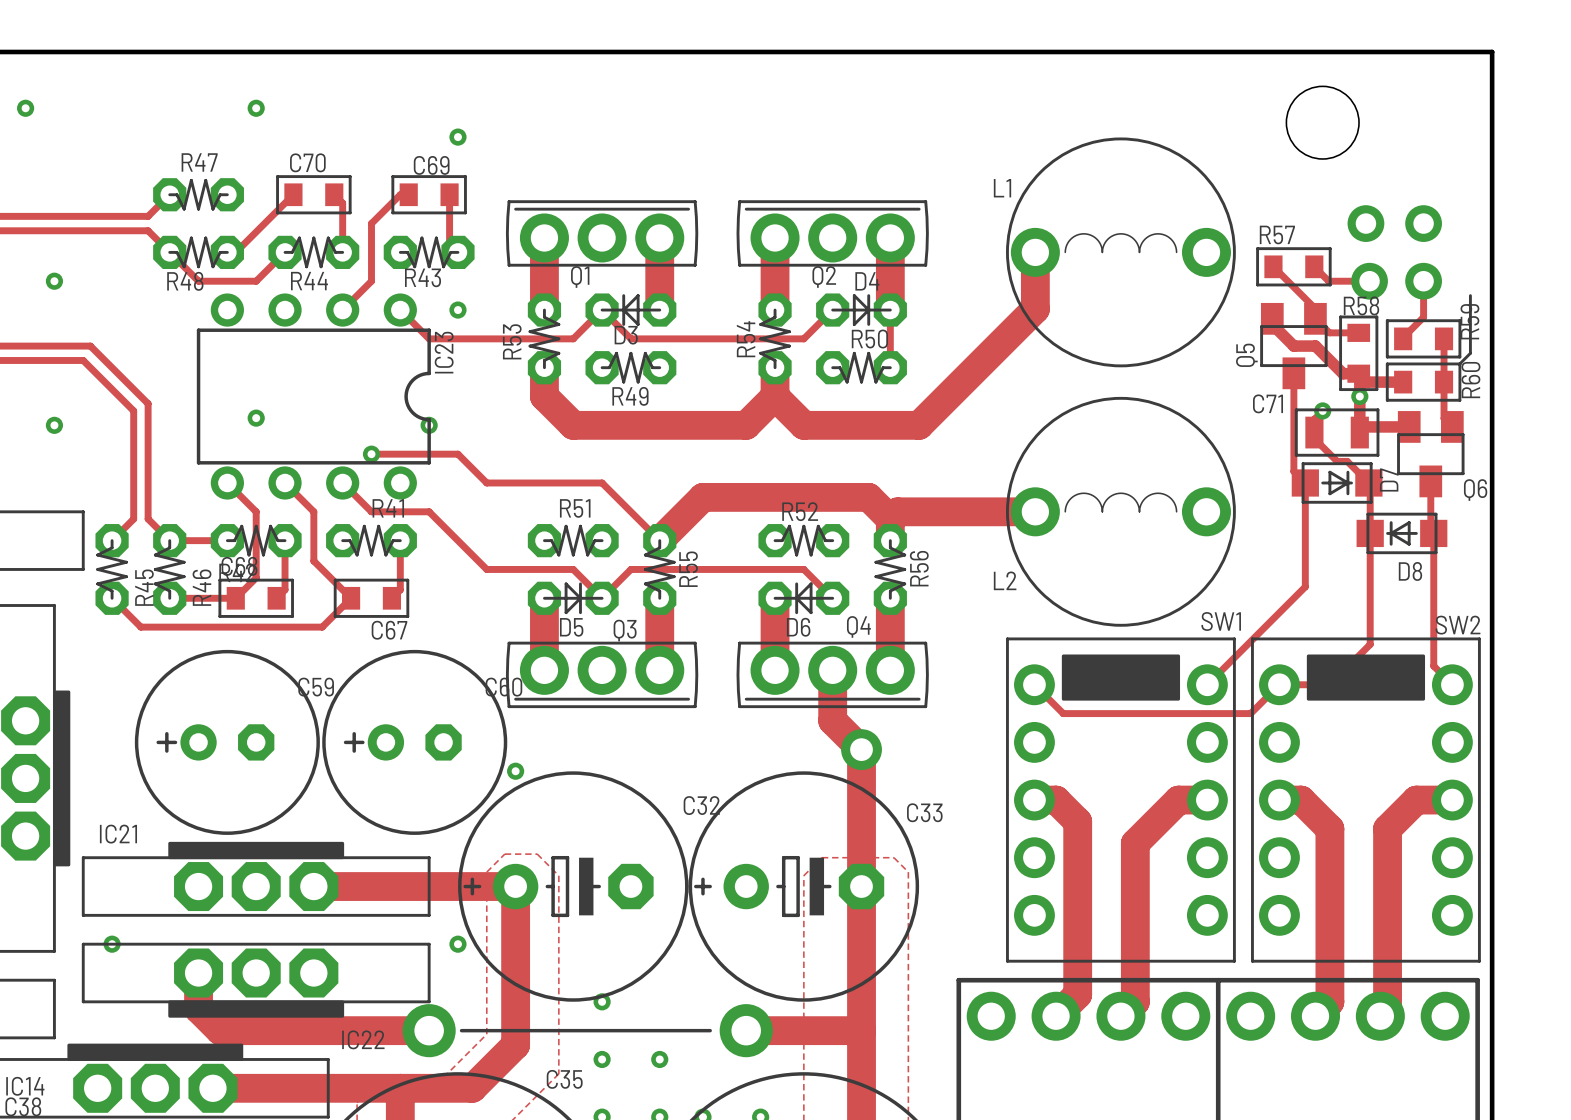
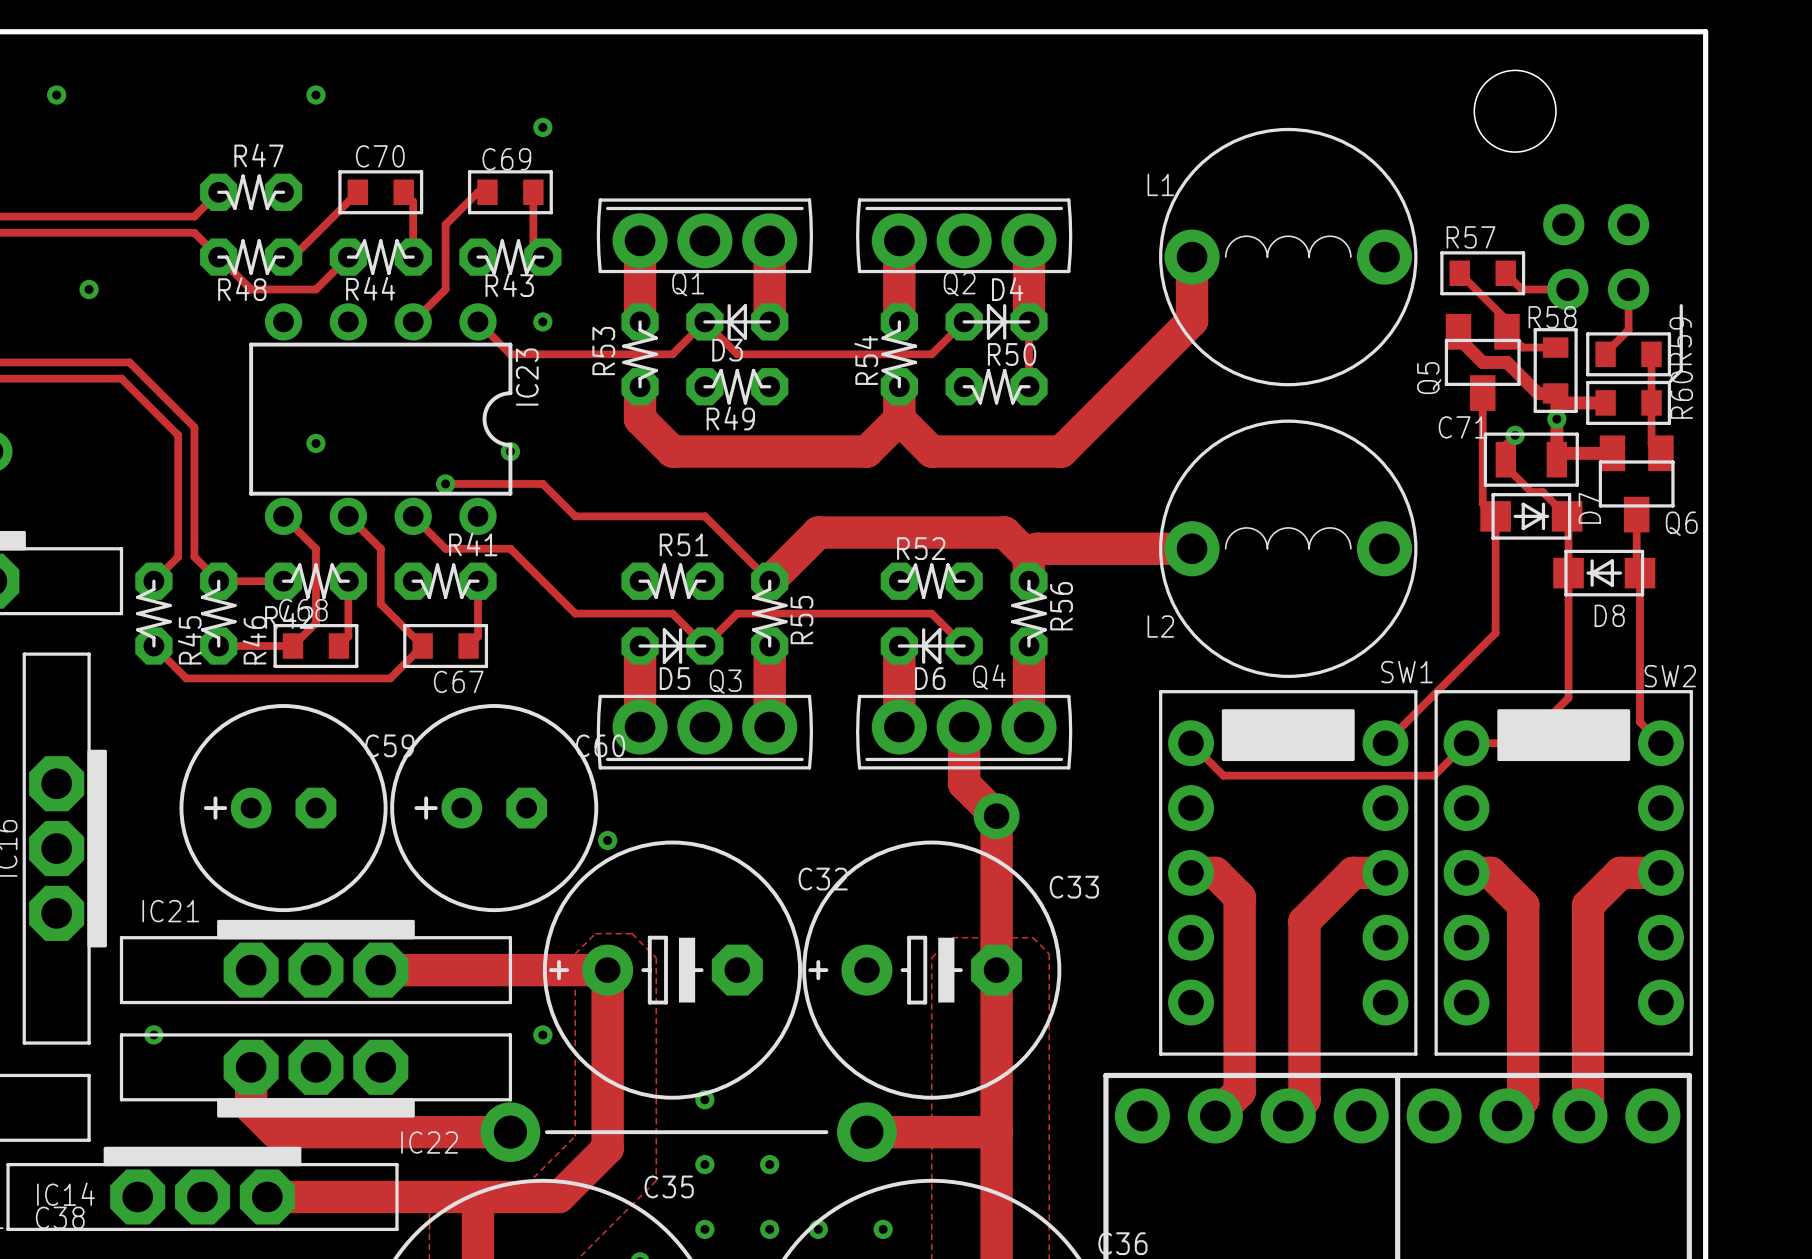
via: (54, 425) -> none

